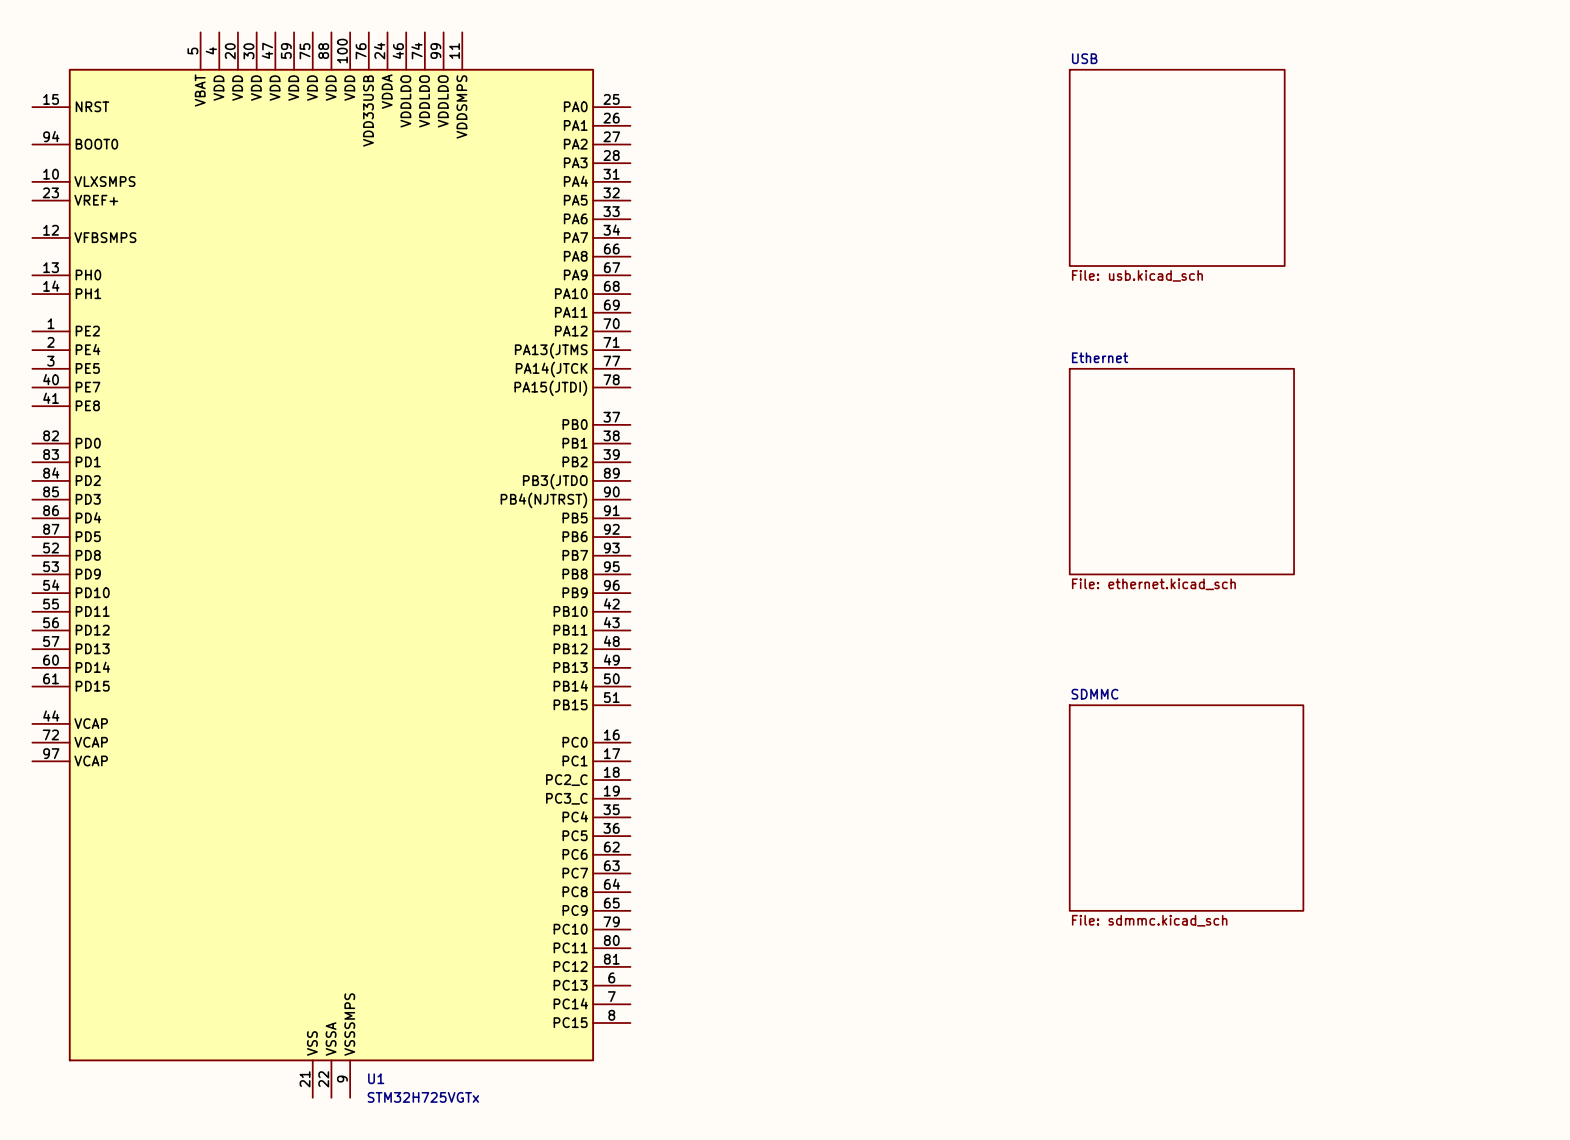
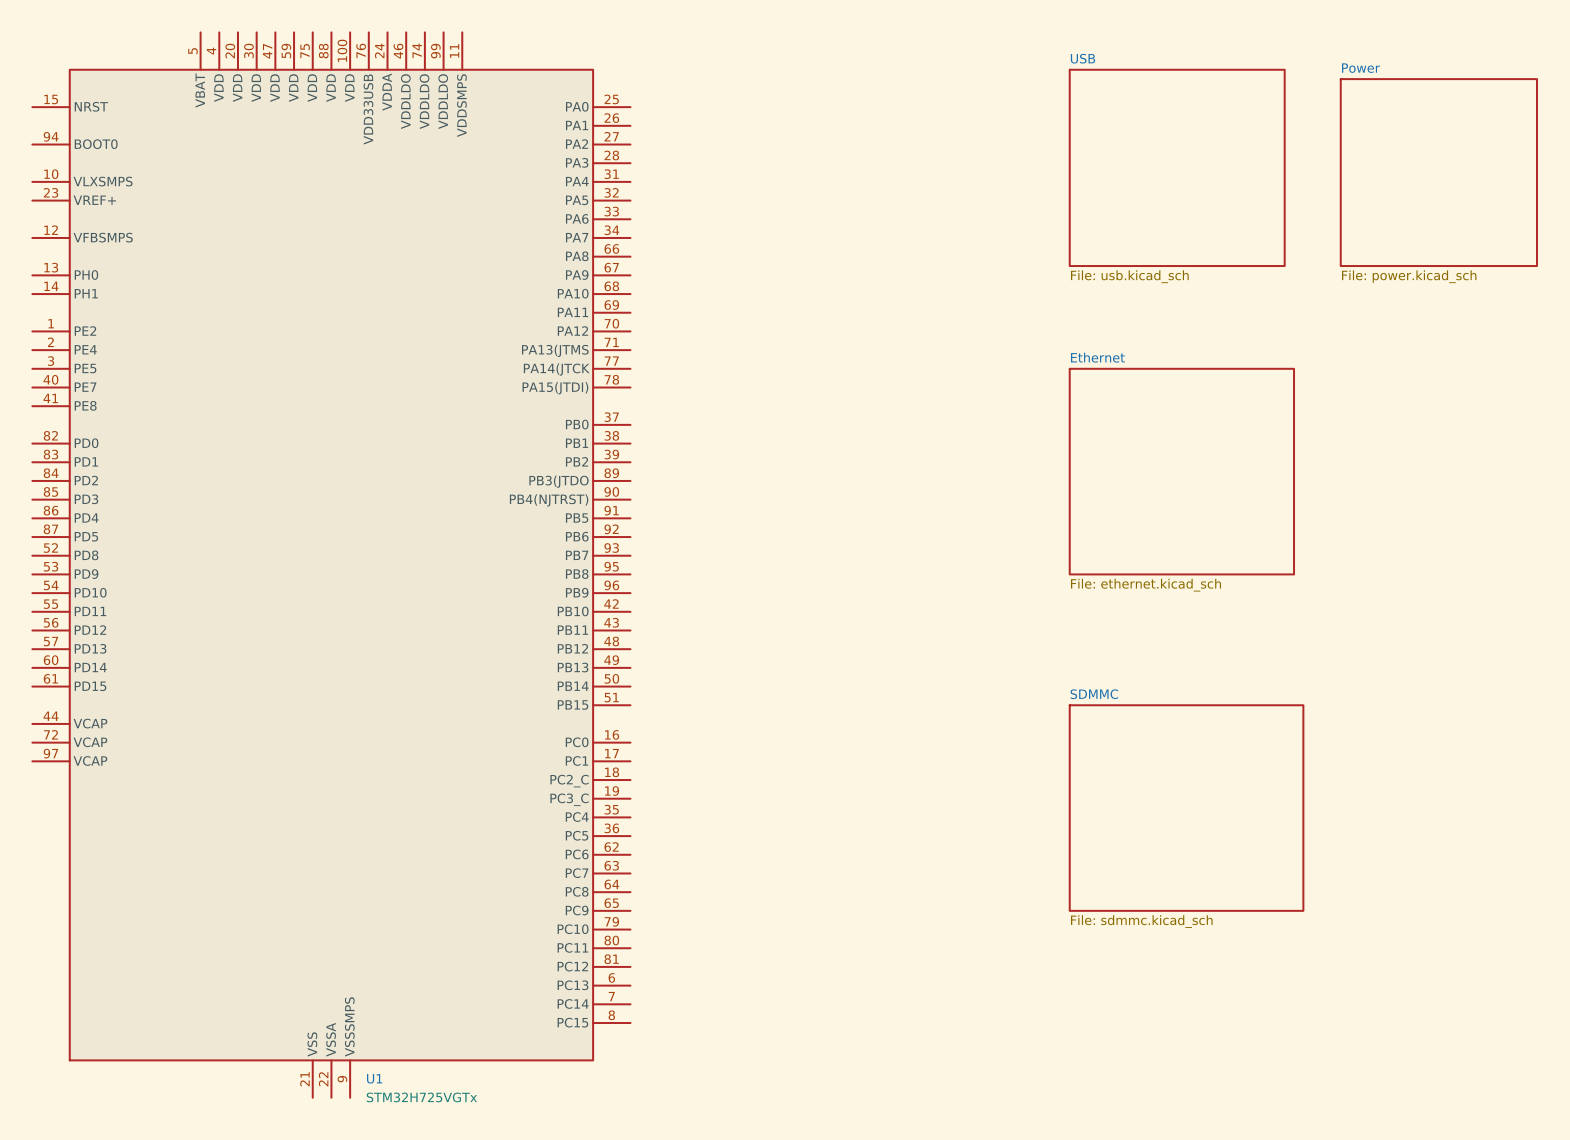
sheet Power: none -> File: power.kicad_sch (1438, 172)

